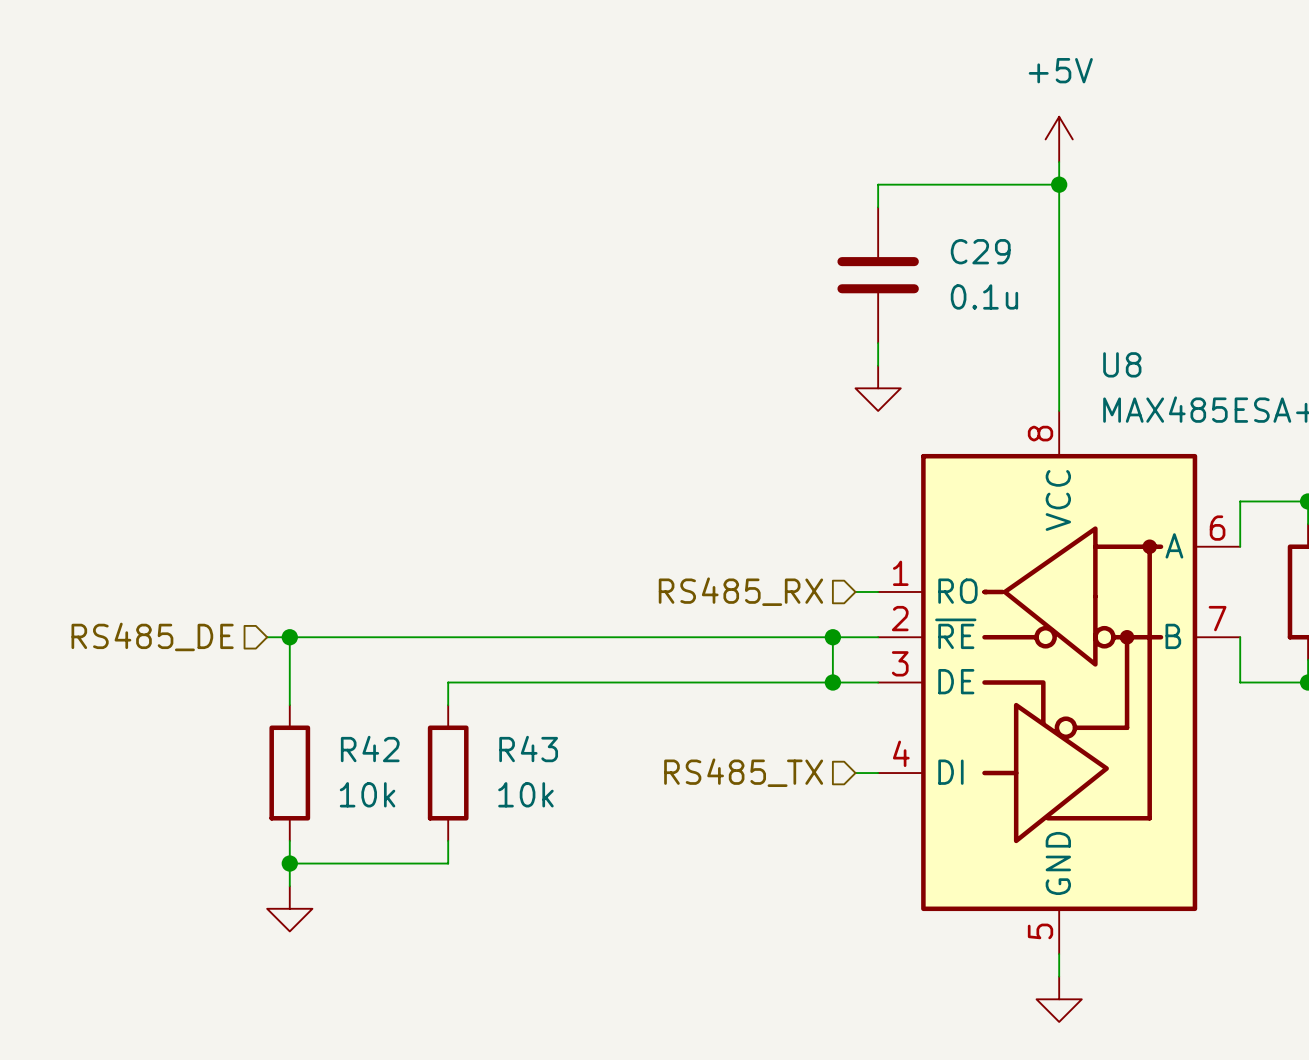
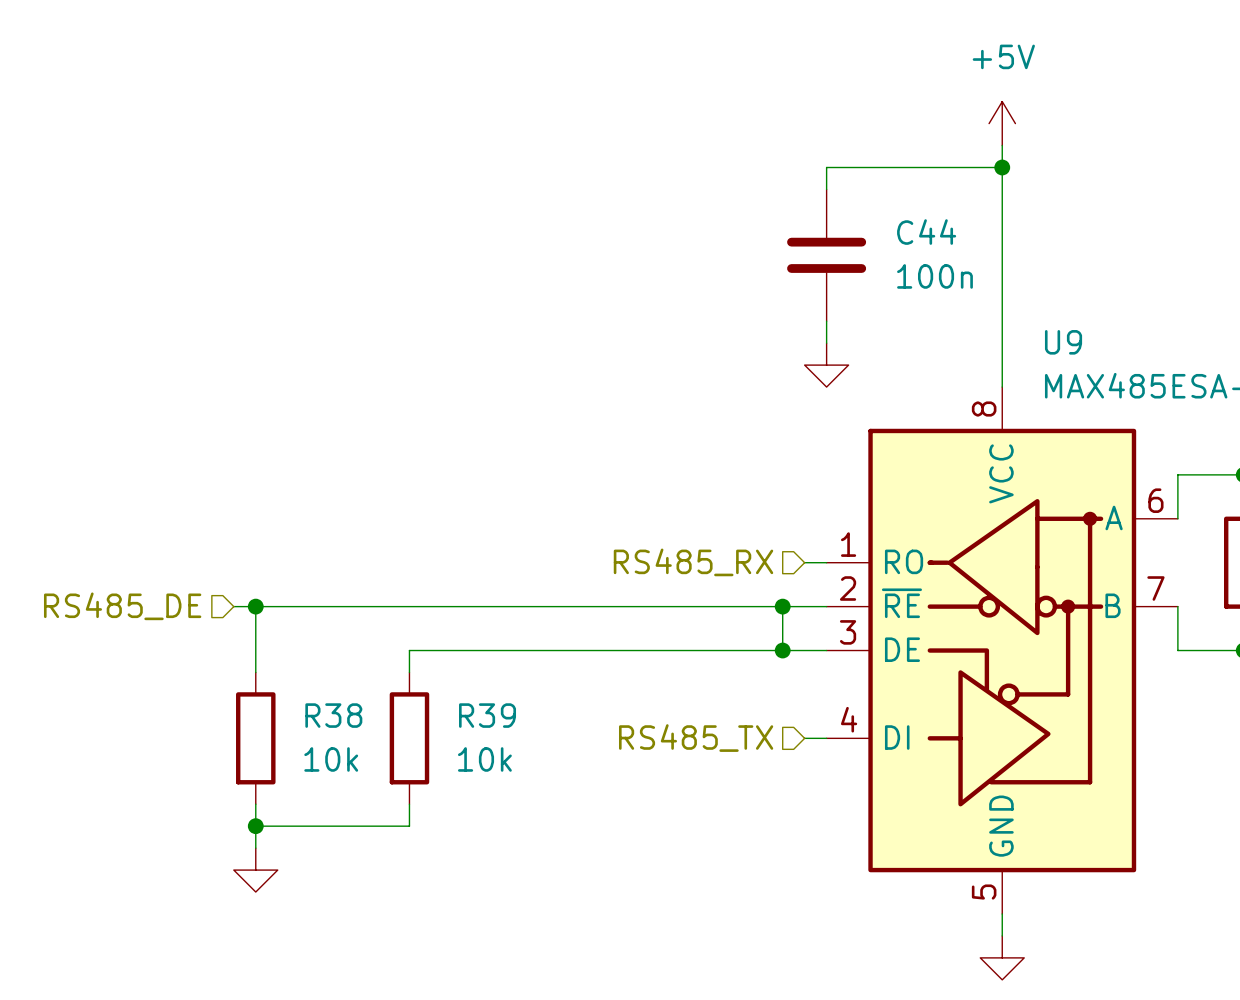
C29 name: C29 (980, 251) -> C44 (926, 232)
C29 value: 0.1u (984, 296) -> 100n (934, 276)
U8 name: U8 (1122, 364) -> U9 (1063, 342)
R42 name: R42 (370, 749) -> R38 (333, 715)
R43 name: R43 (528, 749) -> R39 (487, 715)

